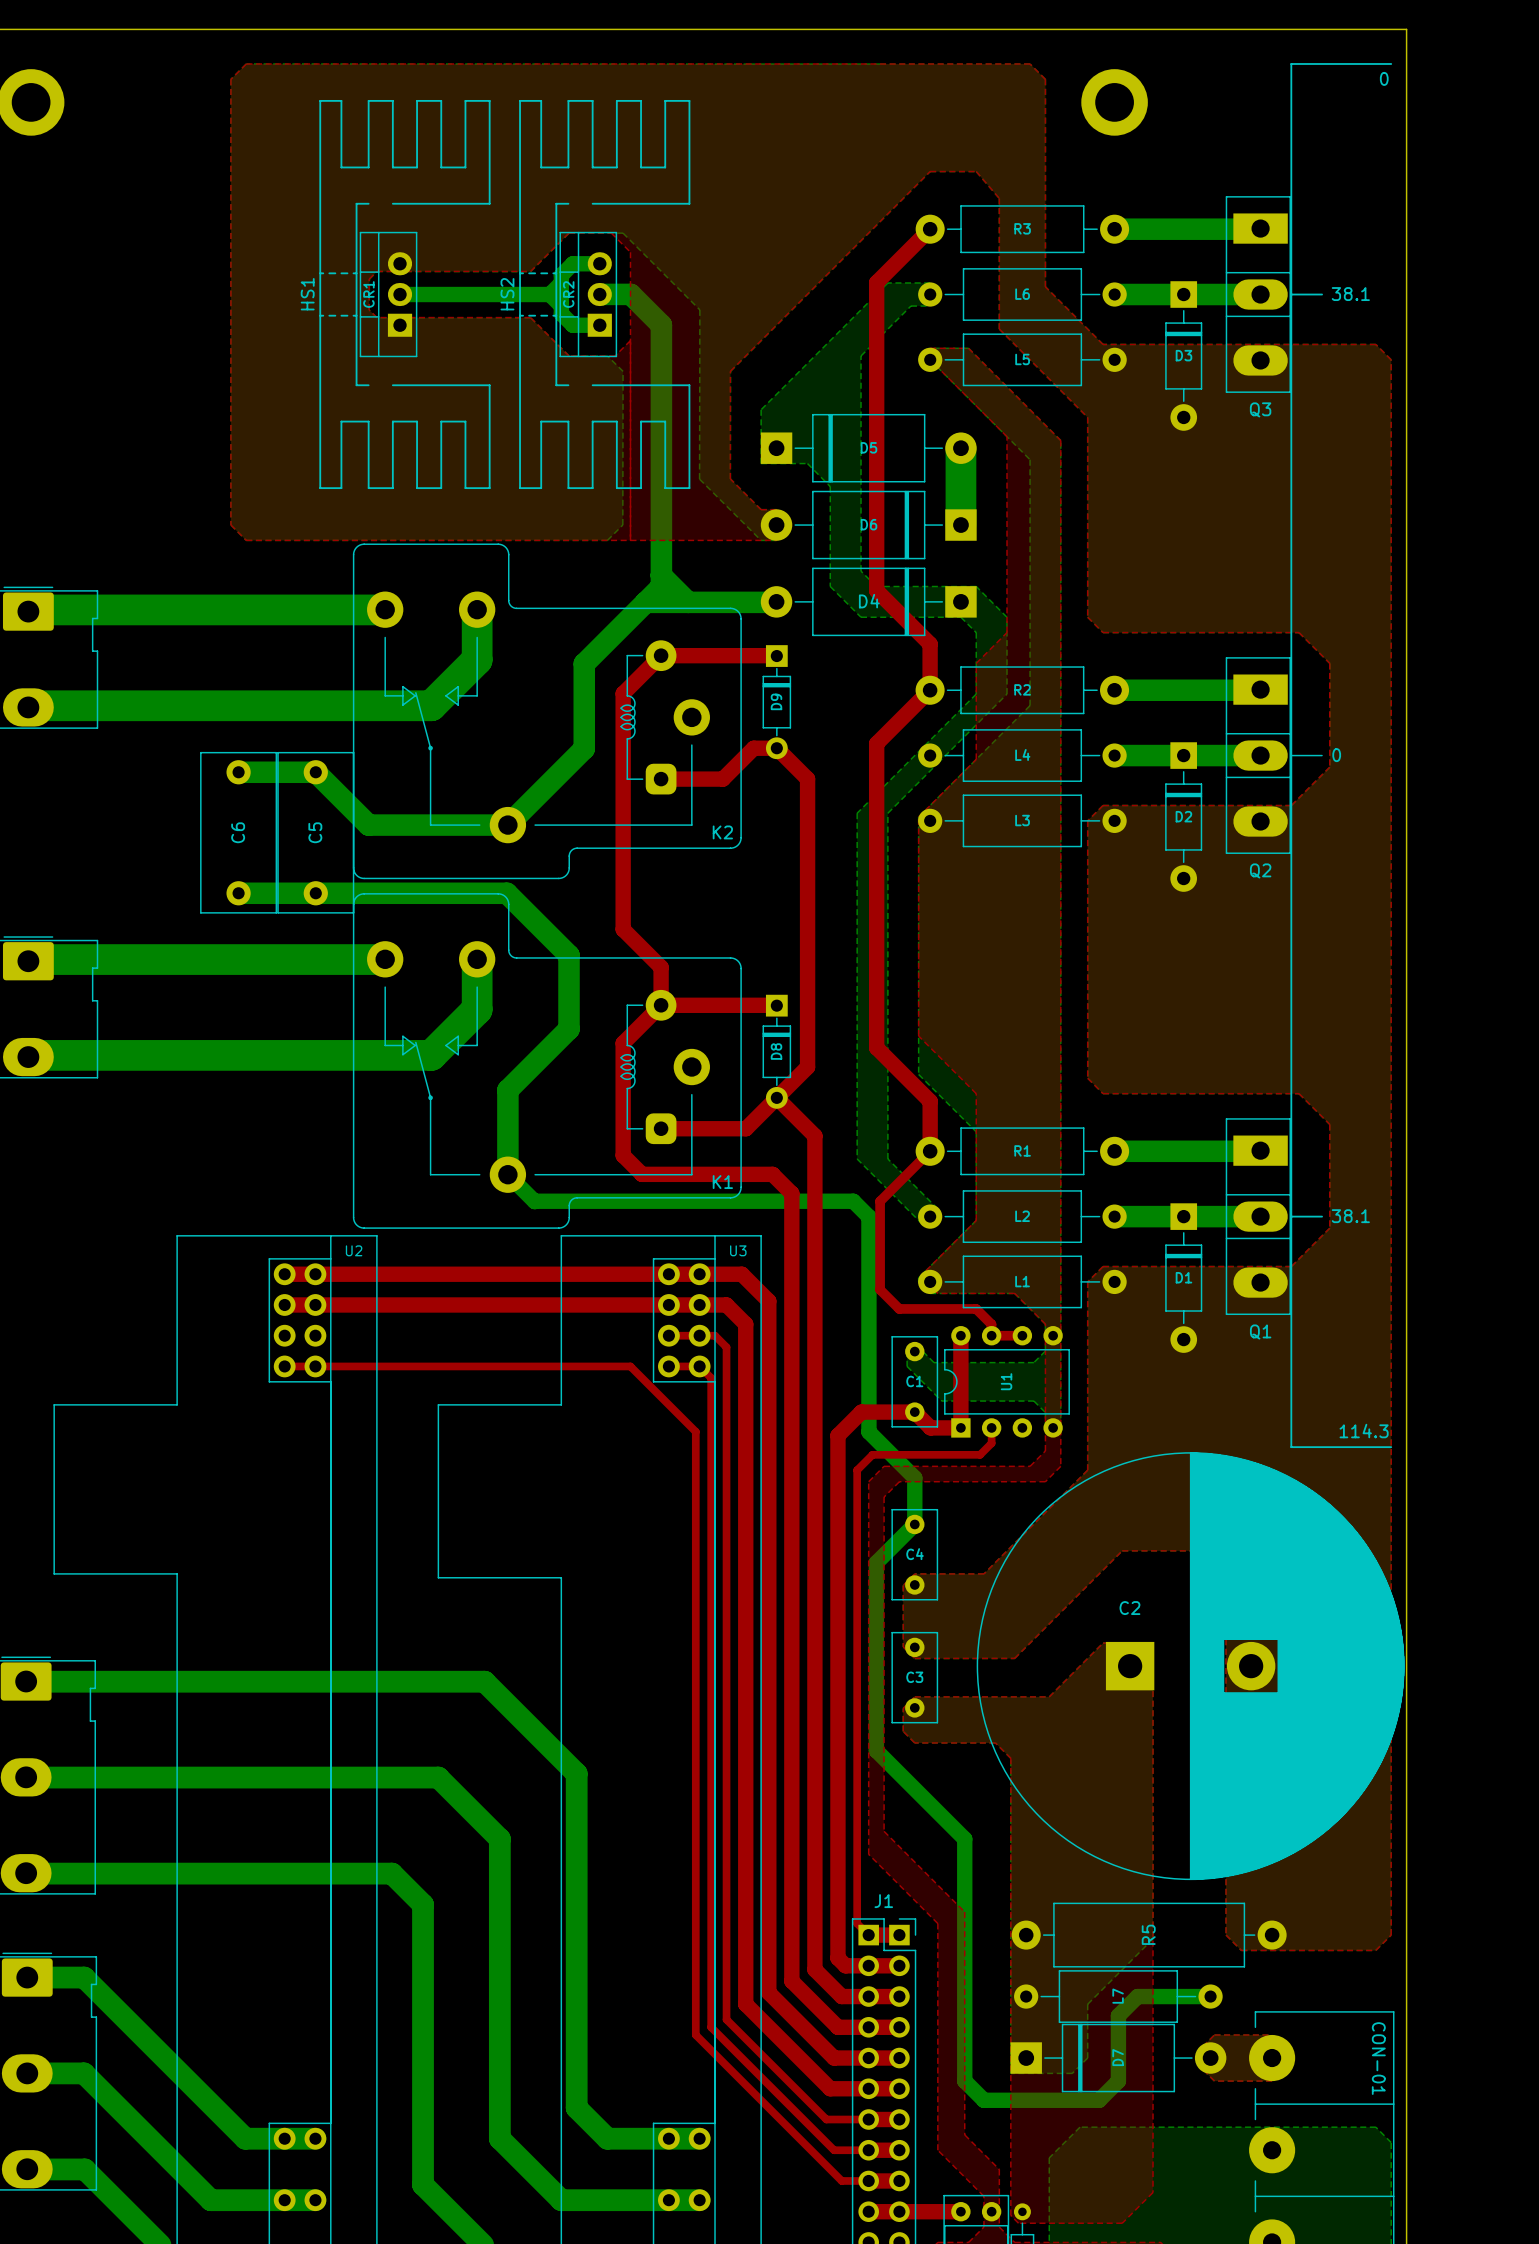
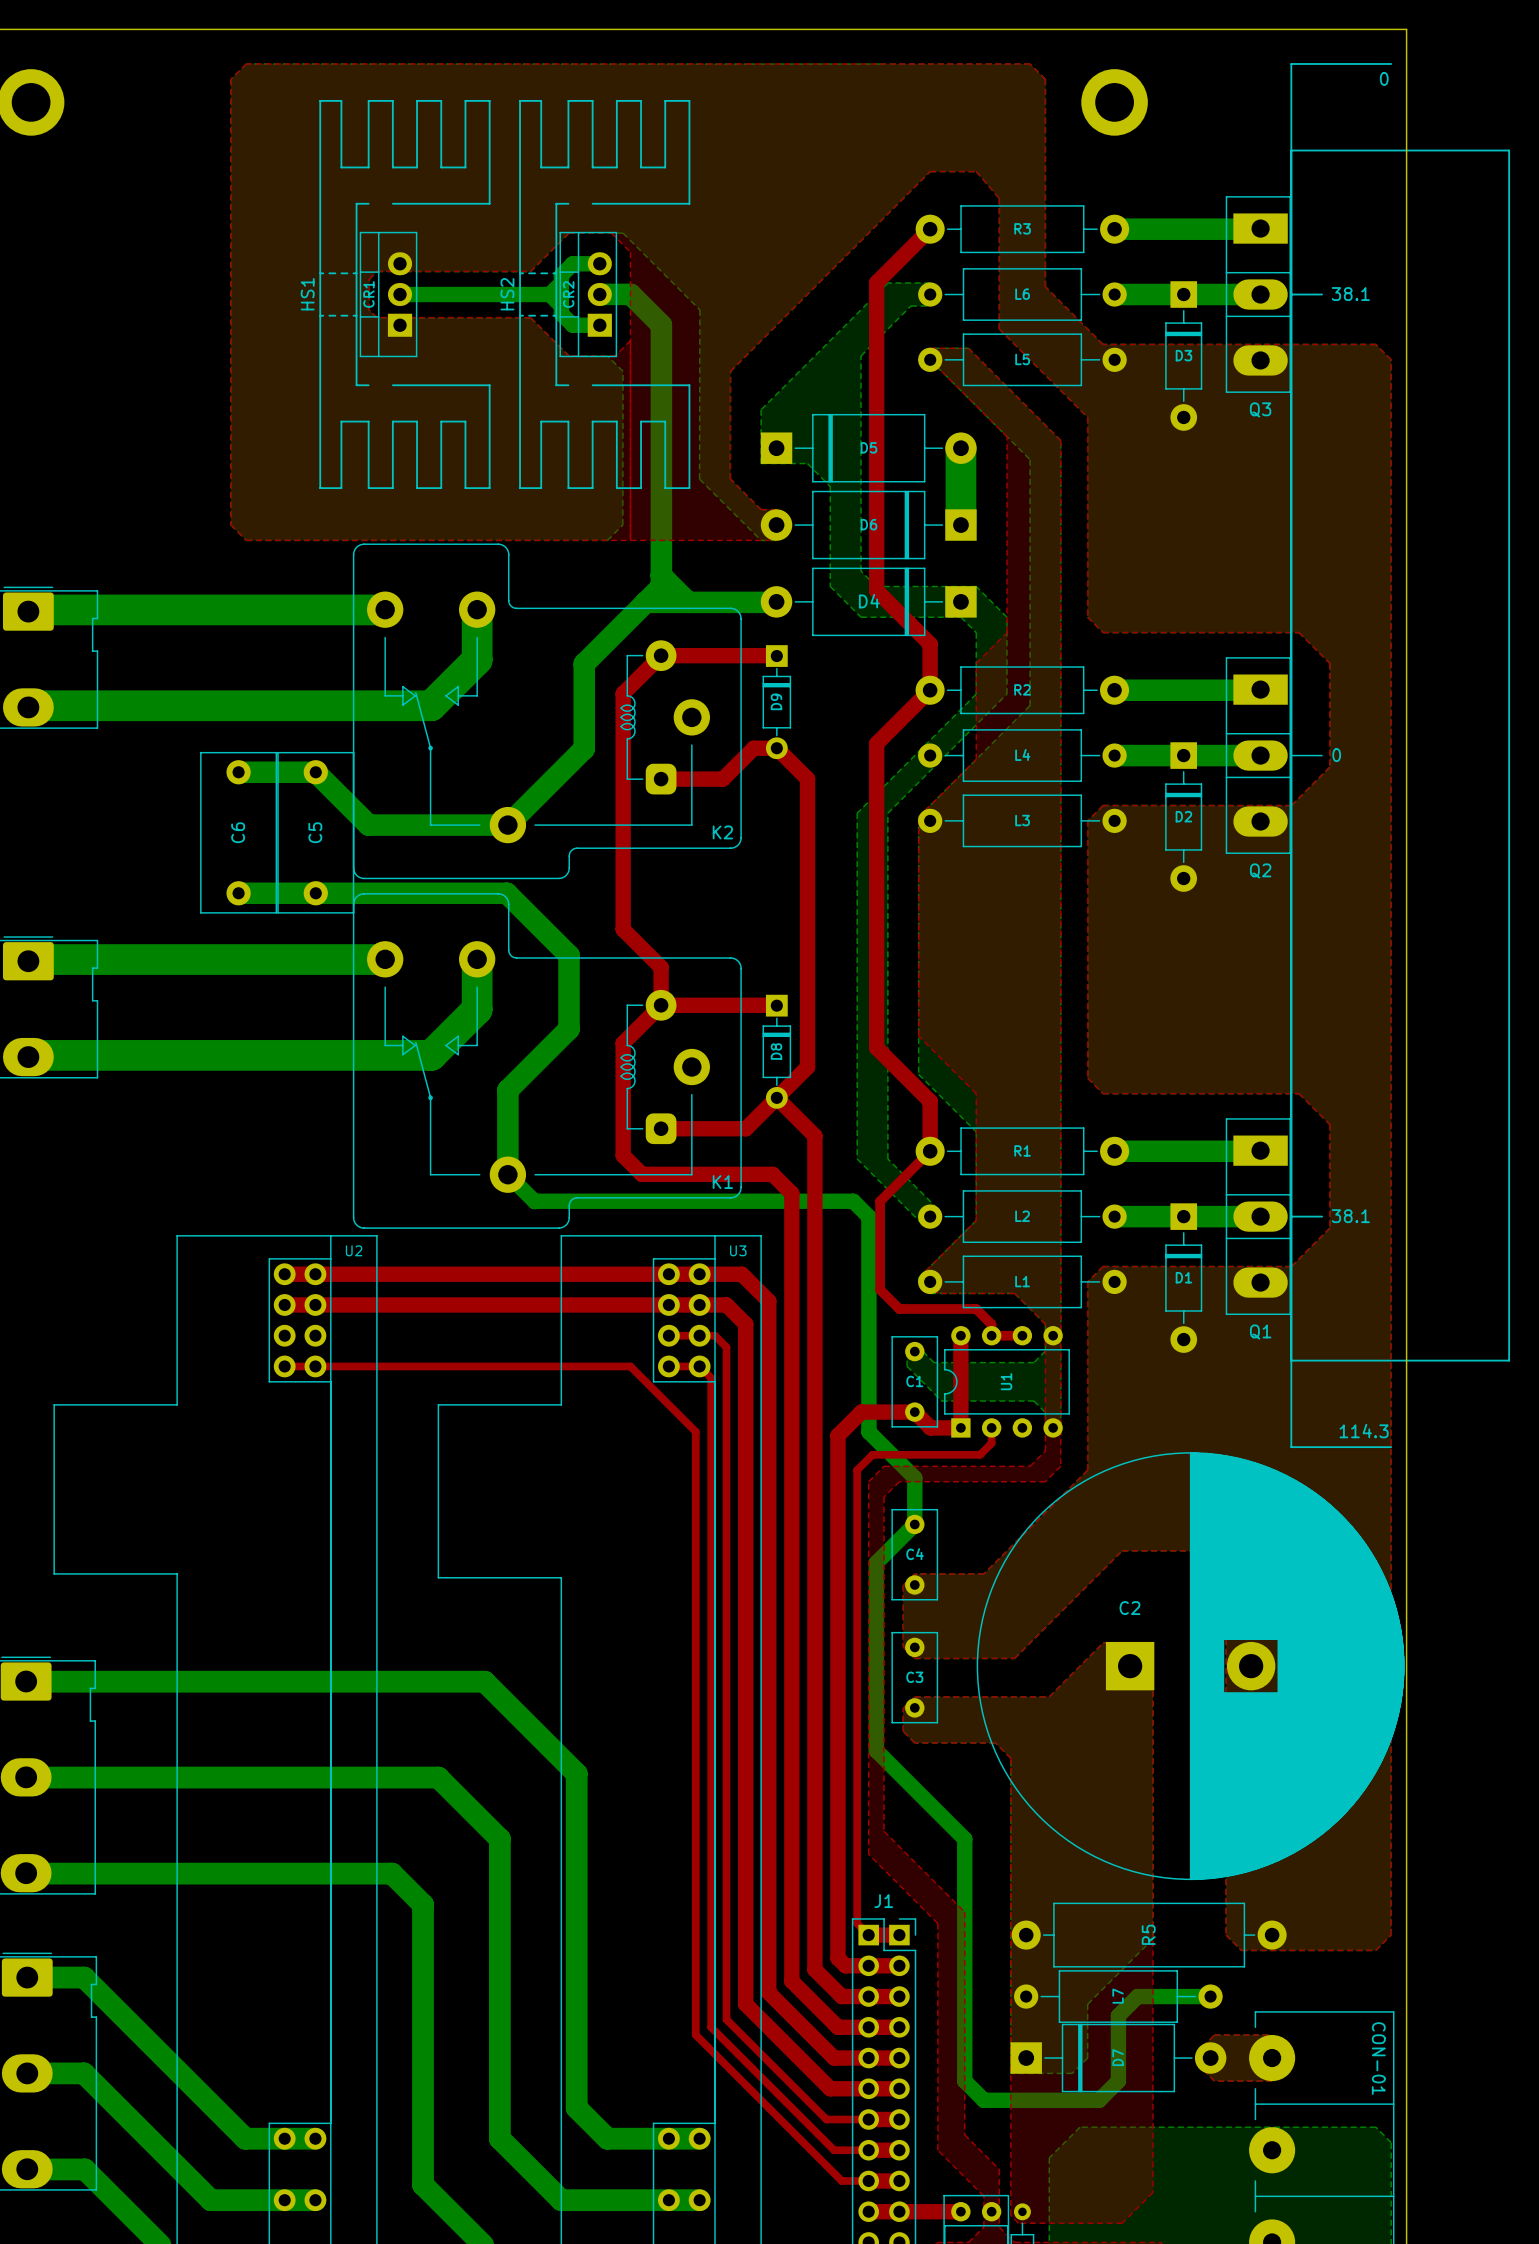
drawing: none -> [1290, 149, 1511, 1362]

